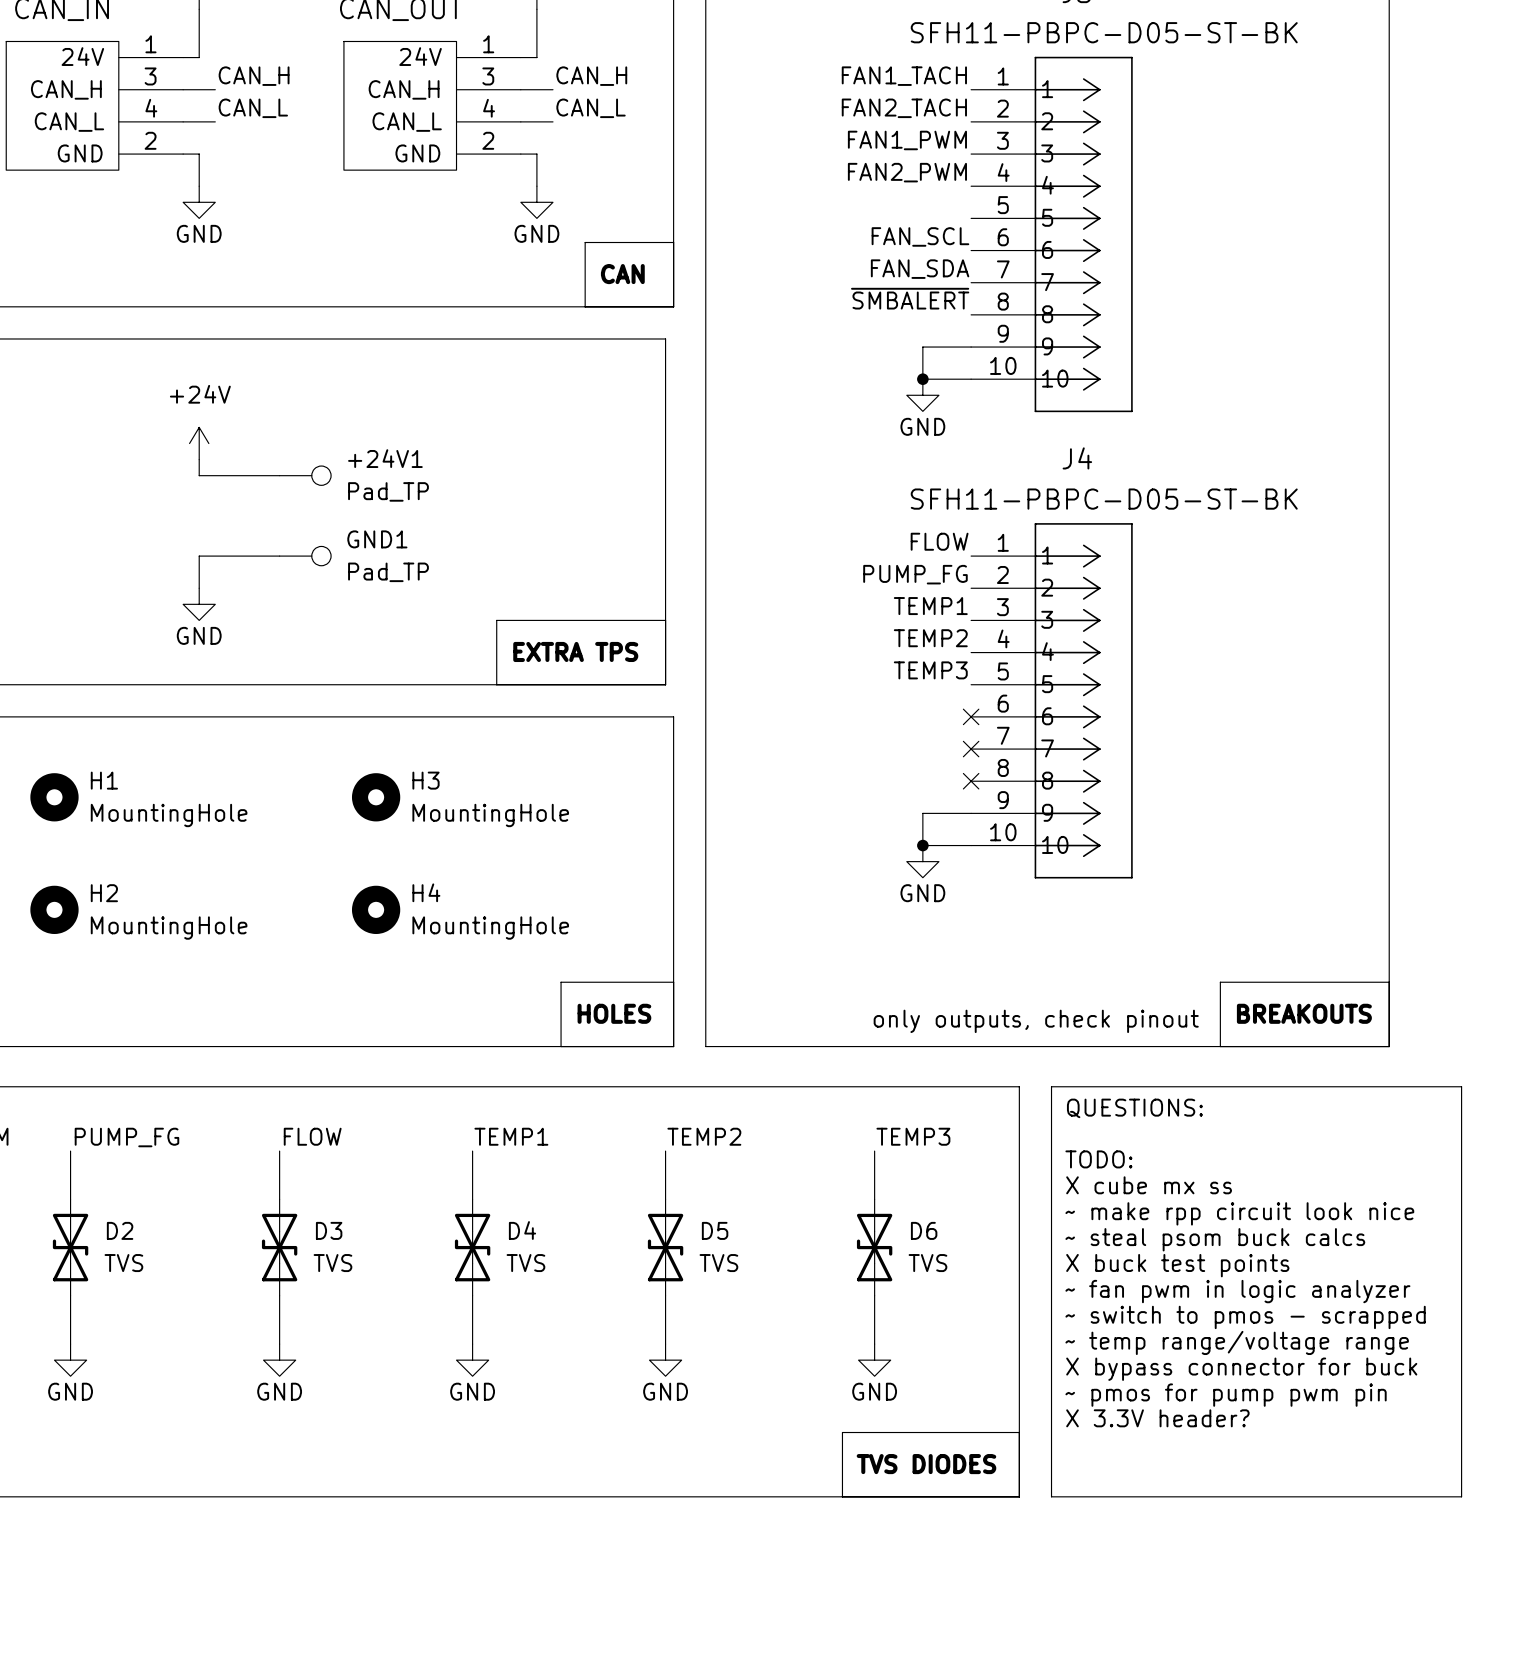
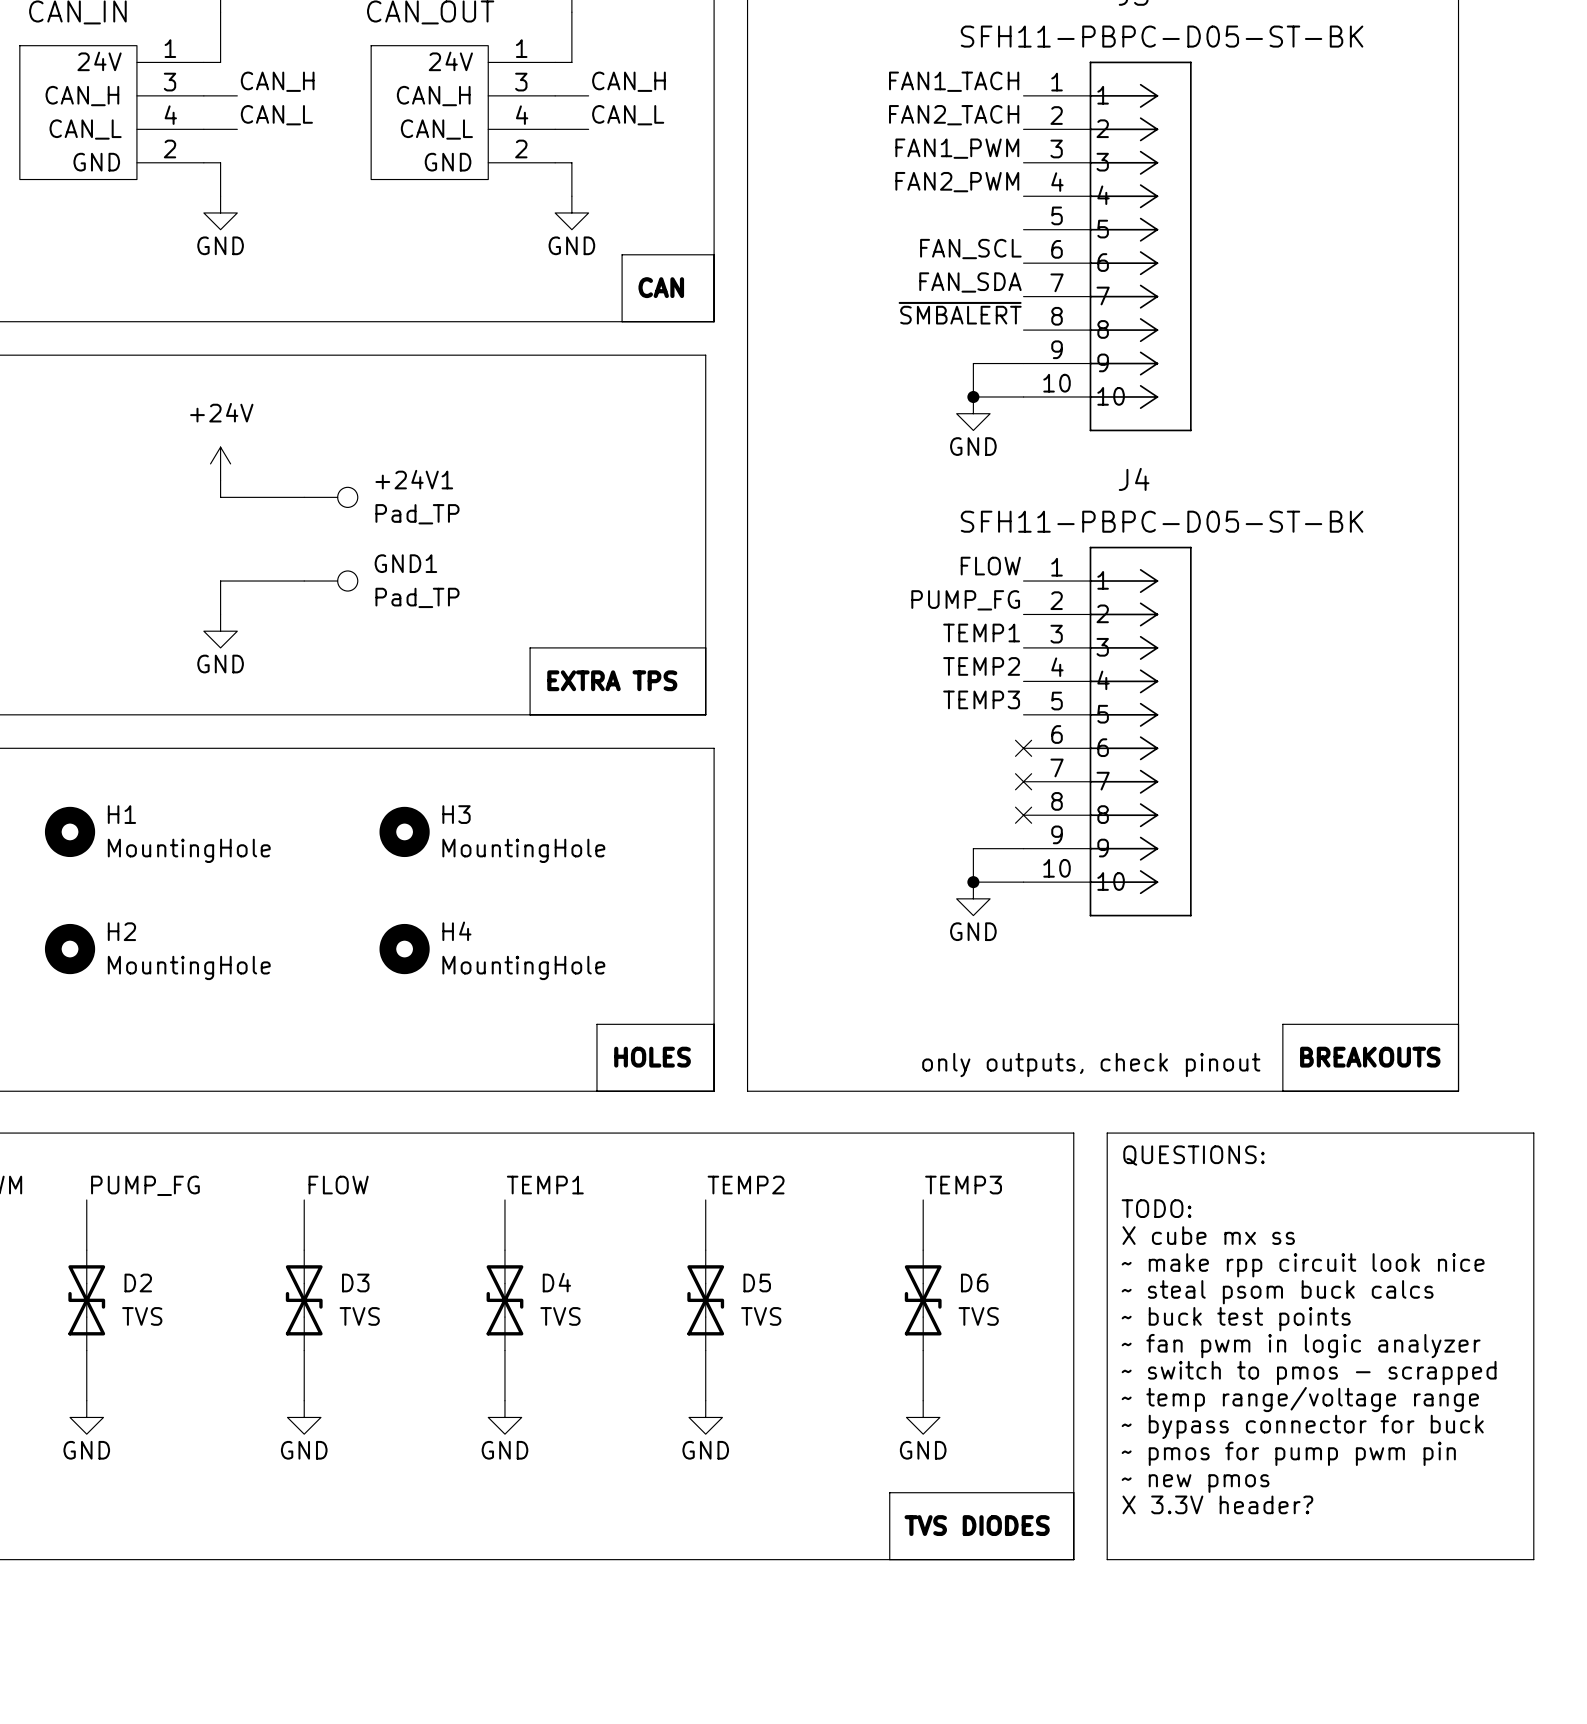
text: X buck test points (1177, 1265) -> ~ buck test points (1236, 1319)
text: X bypass connector for buck (1241, 1369) -> ~ bypass connector for buck (1302, 1426)
text: X 3.3V header? (1157, 1418) -> ~ new pmos (1195, 1483)
text: none -> X 3.3V header? (1217, 1504)

